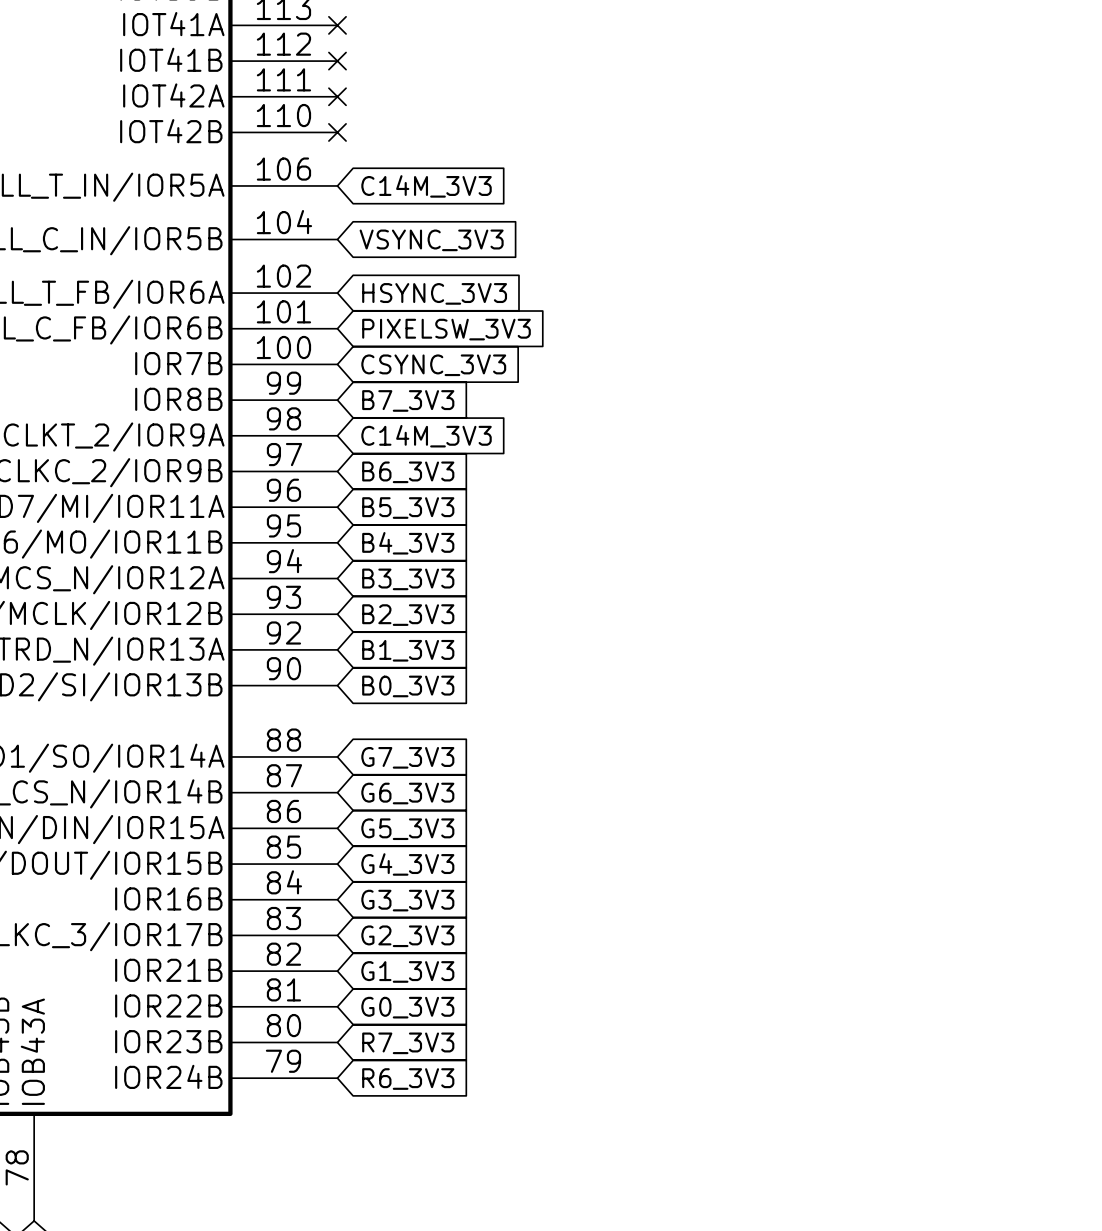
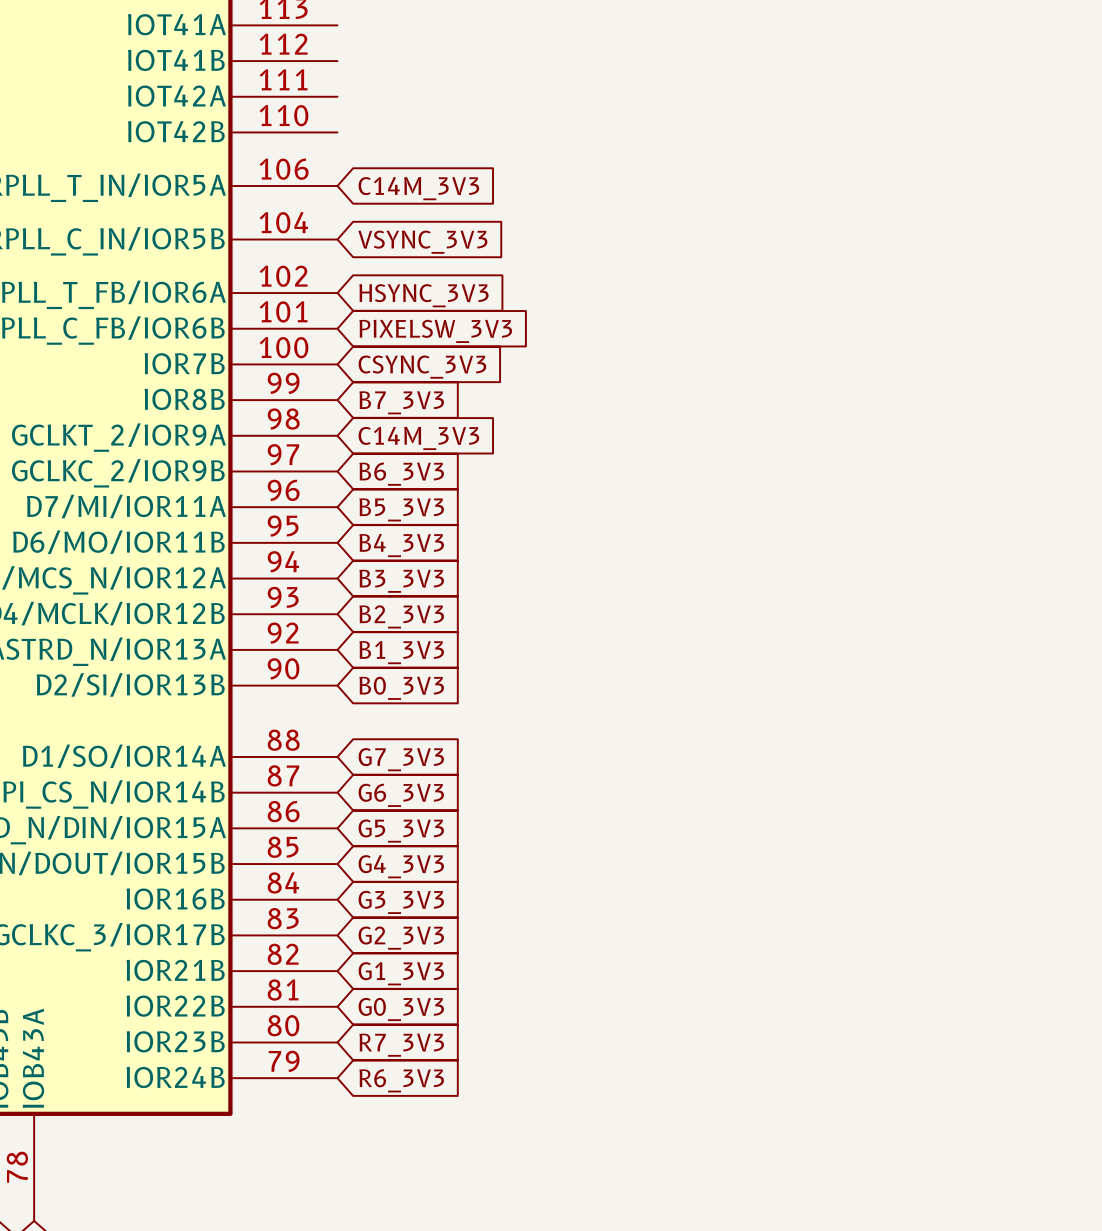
no-connect mark: (337, 25) -> none
no-connect mark: (337, 61) -> none
no-connect mark: (337, 96) -> none
no-connect mark: (337, 132) -> none

